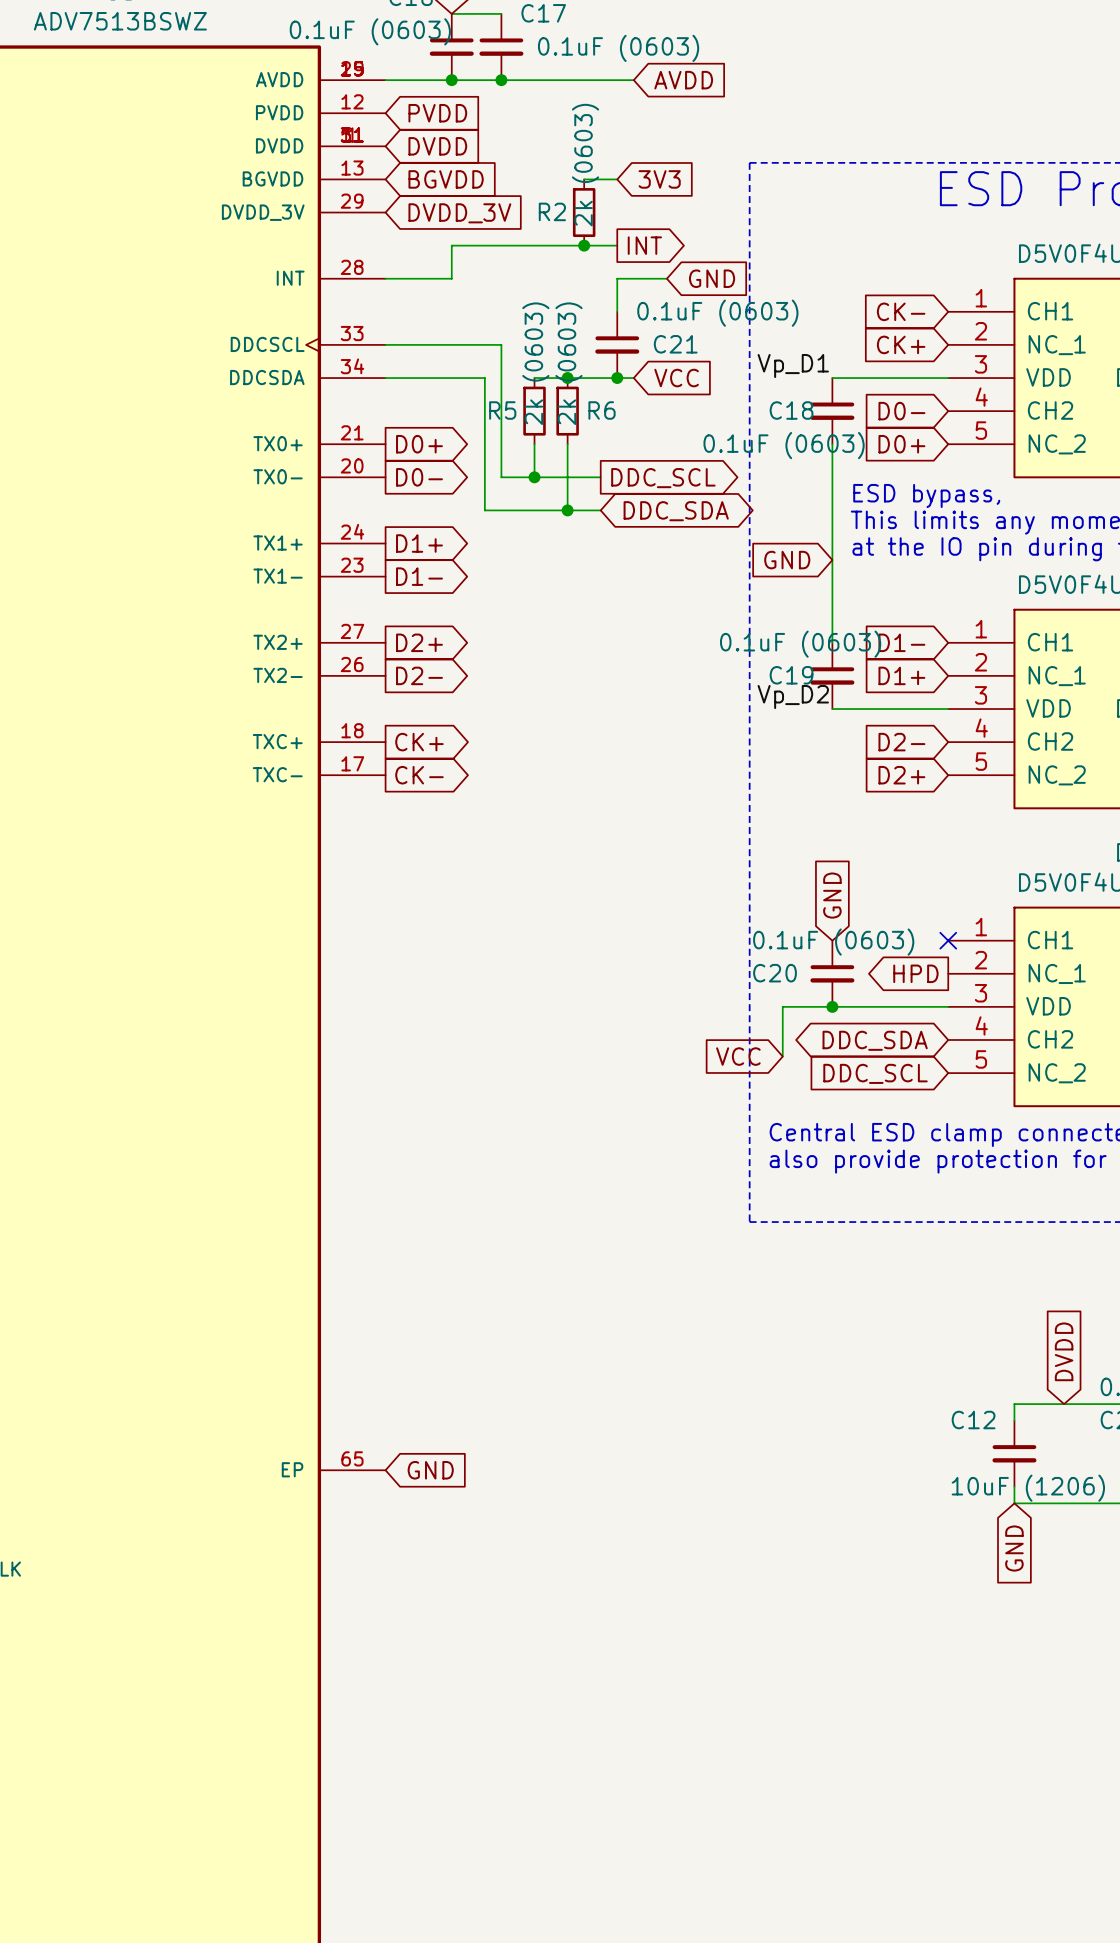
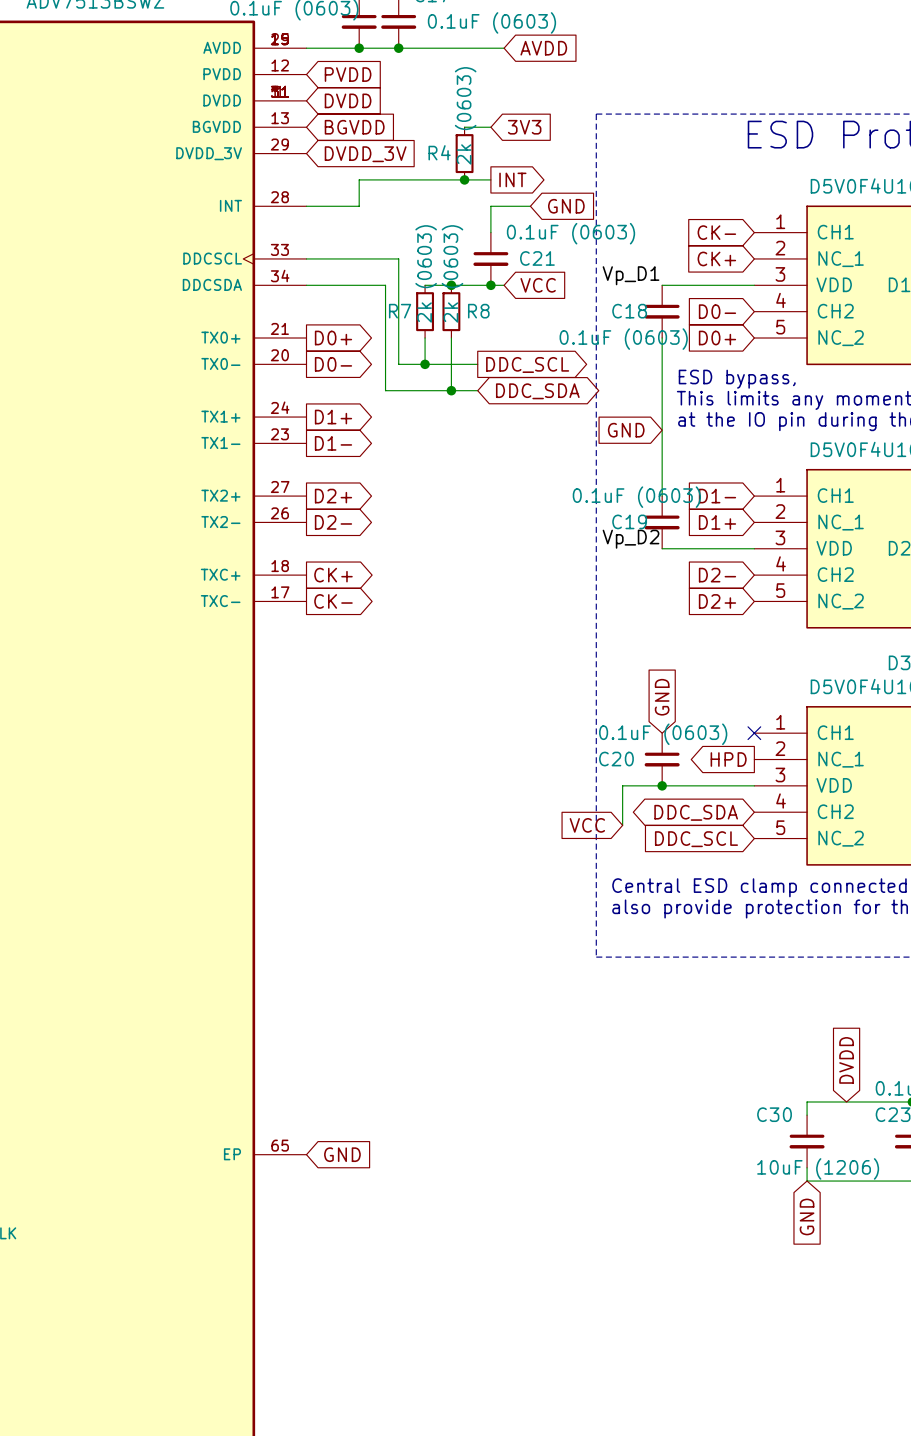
R2 name: R2 (552, 211) -> R4 (439, 152)
R5 name: R5 (502, 410) -> R7 (400, 311)
R6 name: R6 (602, 410) -> R8 (478, 311)
C12 name: C12 (973, 1420) -> C30 (774, 1114)

